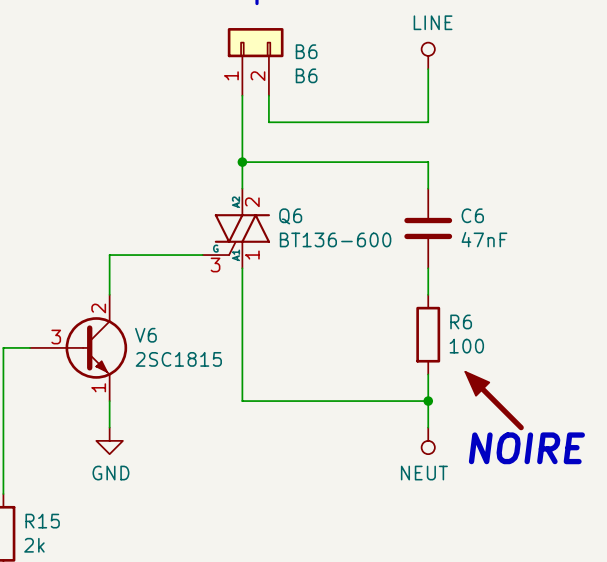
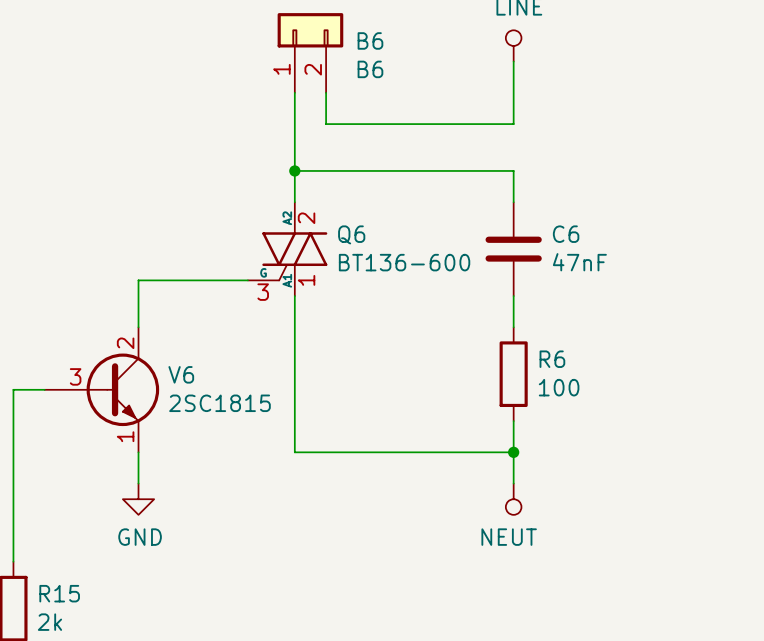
power symbol: (494, 401) -> none
text: NOIRE (526, 448) -> none

